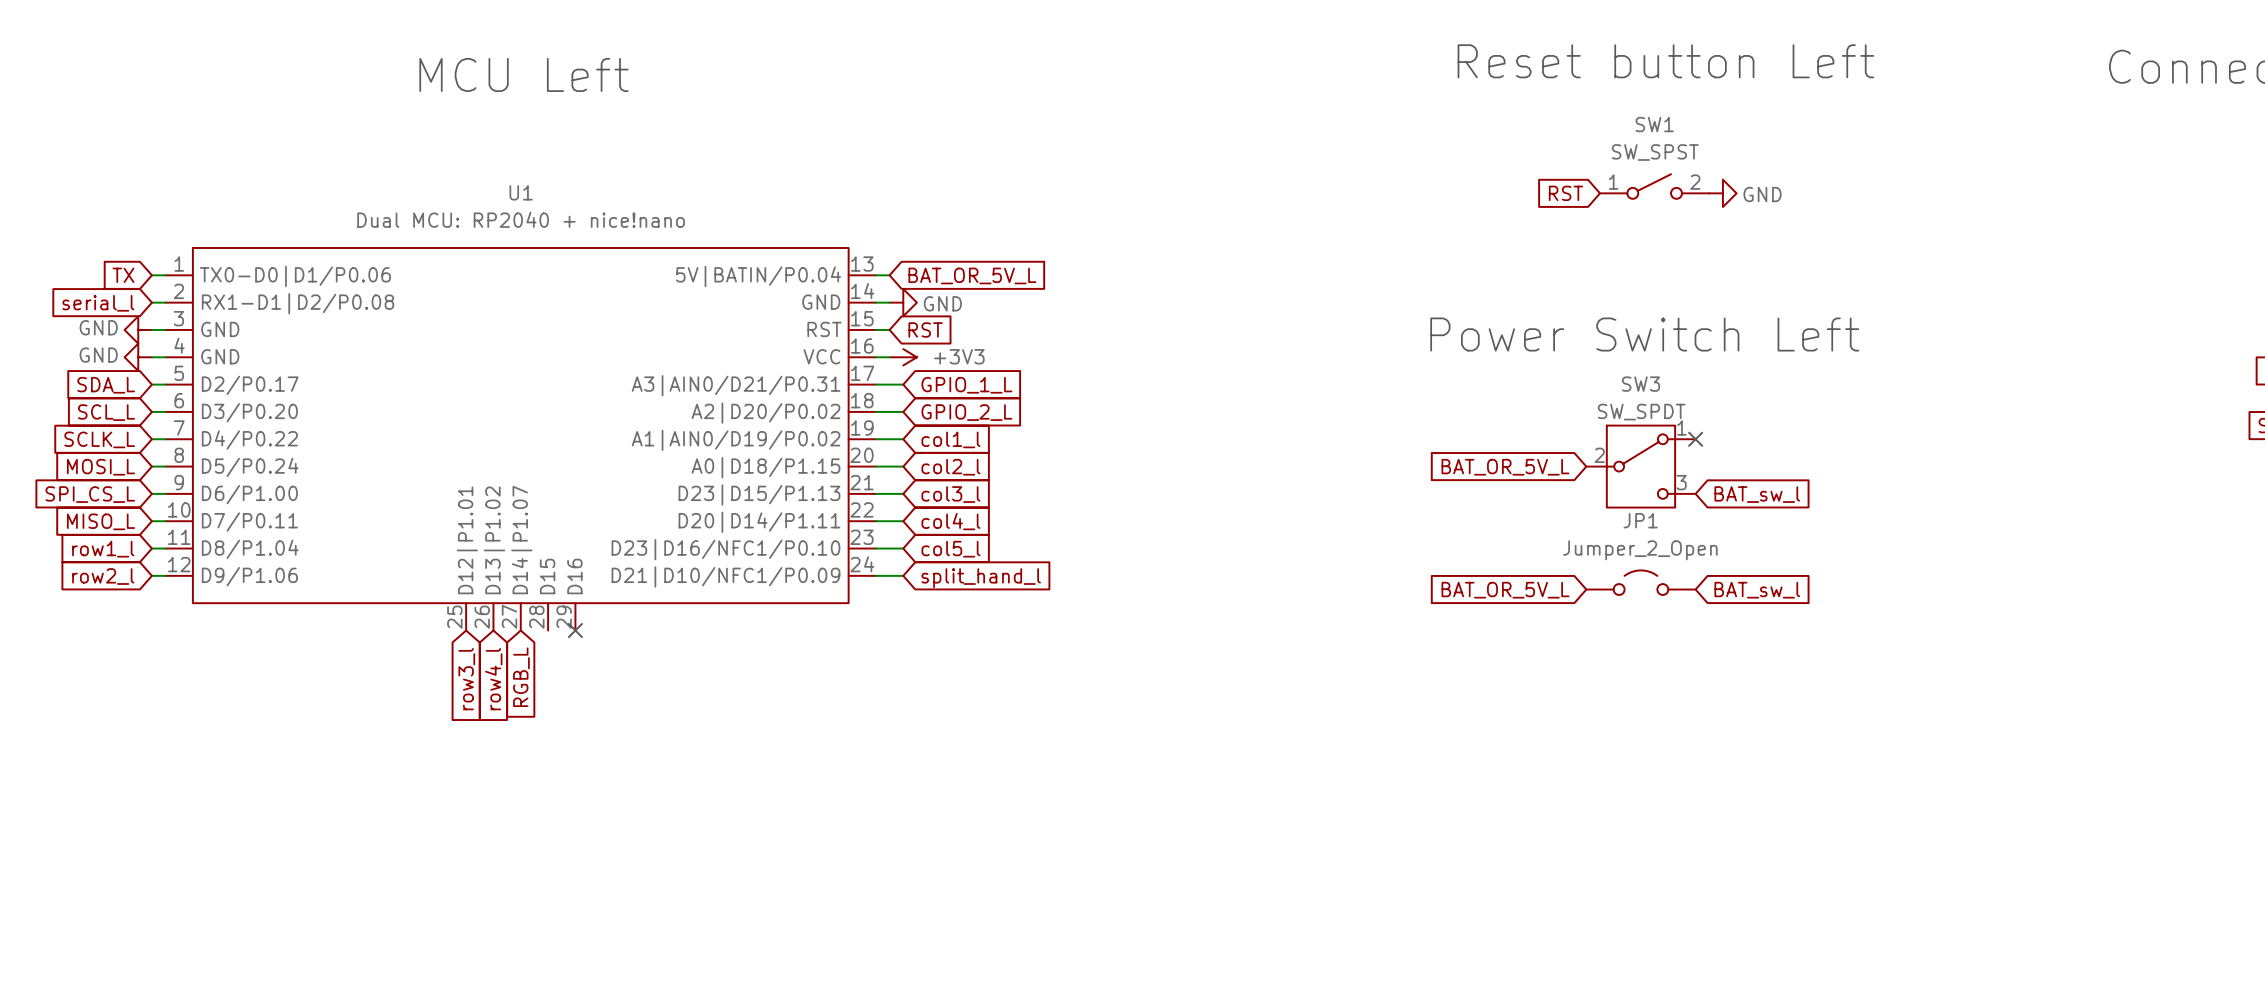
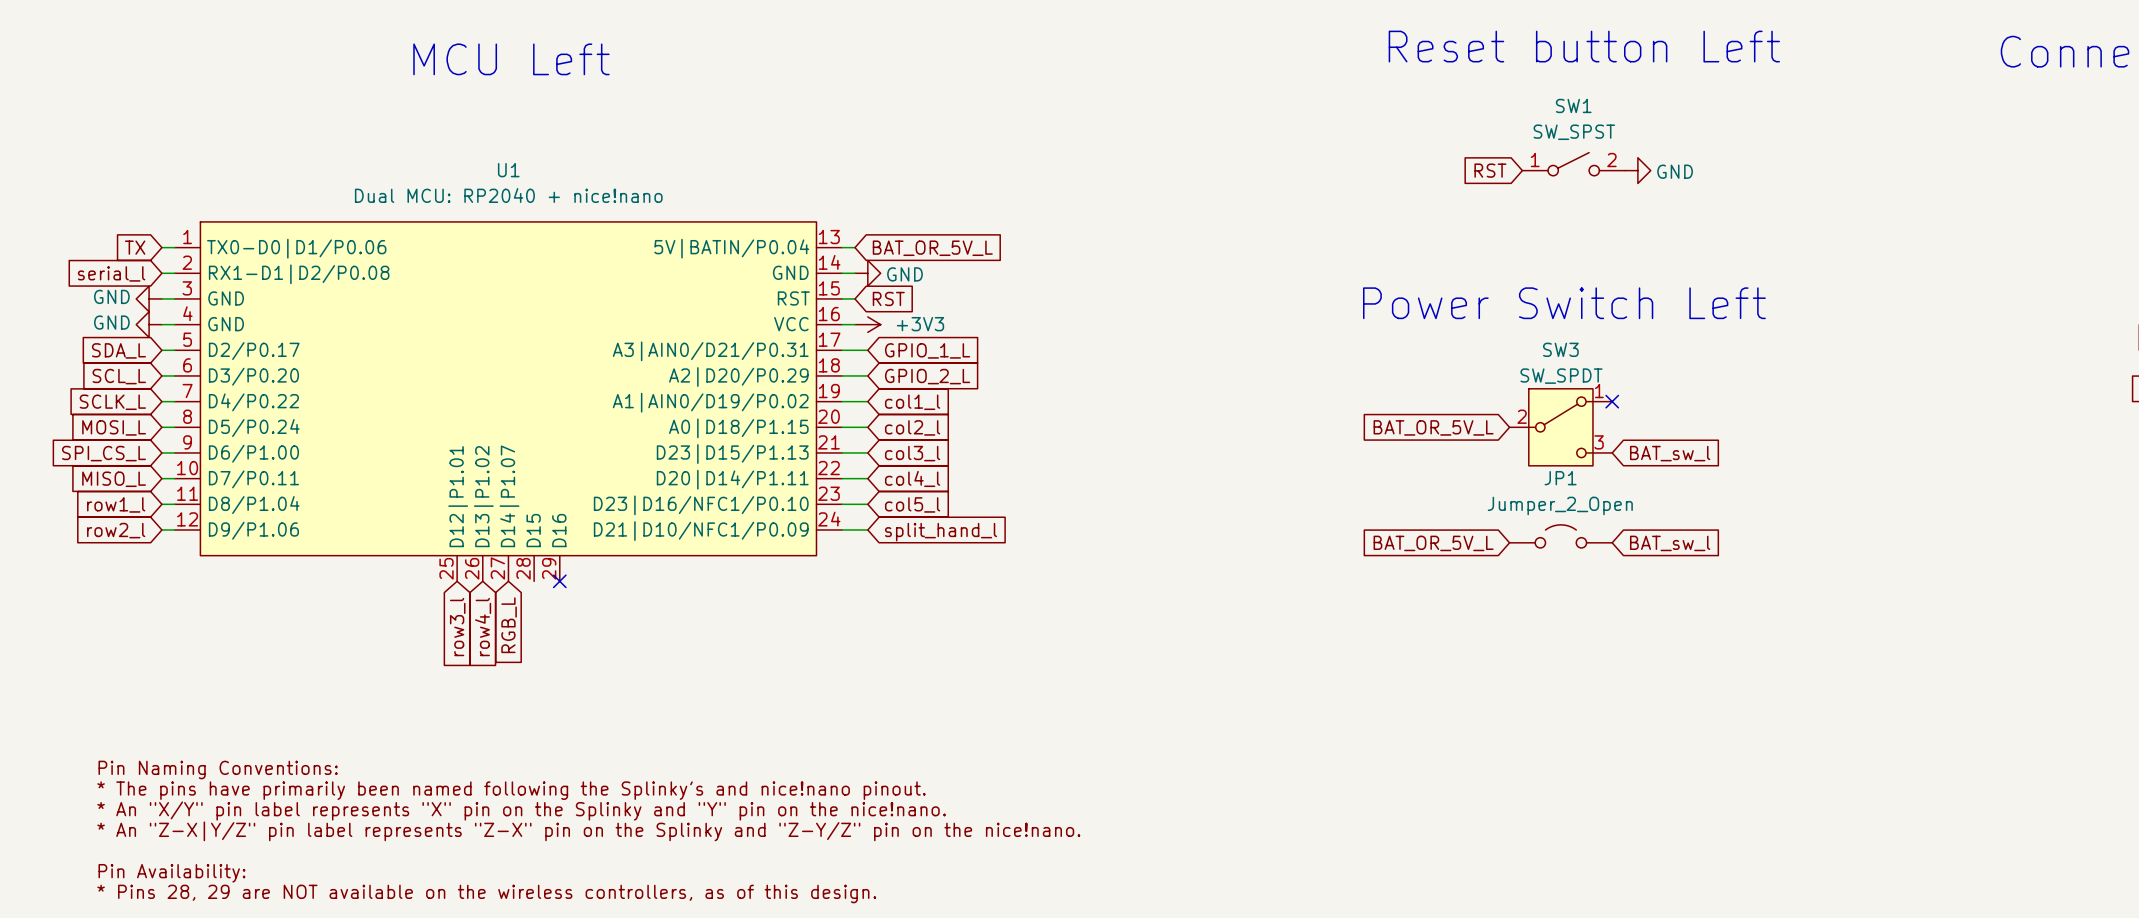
U1 pin name: A2|D20/P0.02 (765, 413) -> A2|D20/P0.29 (738, 377)
U1 text: none -> Pin Naming Conventions: (218, 769)
U1 text: none -> * The pins have primarily been named following the Splinky's and nice!nano pinout. (511, 790)
U1 text: none -> * An "X/Y" pin label represents "X" pin on the Splinky and "Y" pin on the nice!nano. (521, 811)
U1 text: none -> * An "Z-X|Y/Z" pin label represents "Z-X" pin on the Splinky and "Z-Y/Z" pin on the nice!nano. (588, 831)
U1 text: none -> Pin Availability: (171, 873)
U1 text: none -> * Pins 28, 29 are NOT available on the wireless controllers, as of this design. (486, 893)

